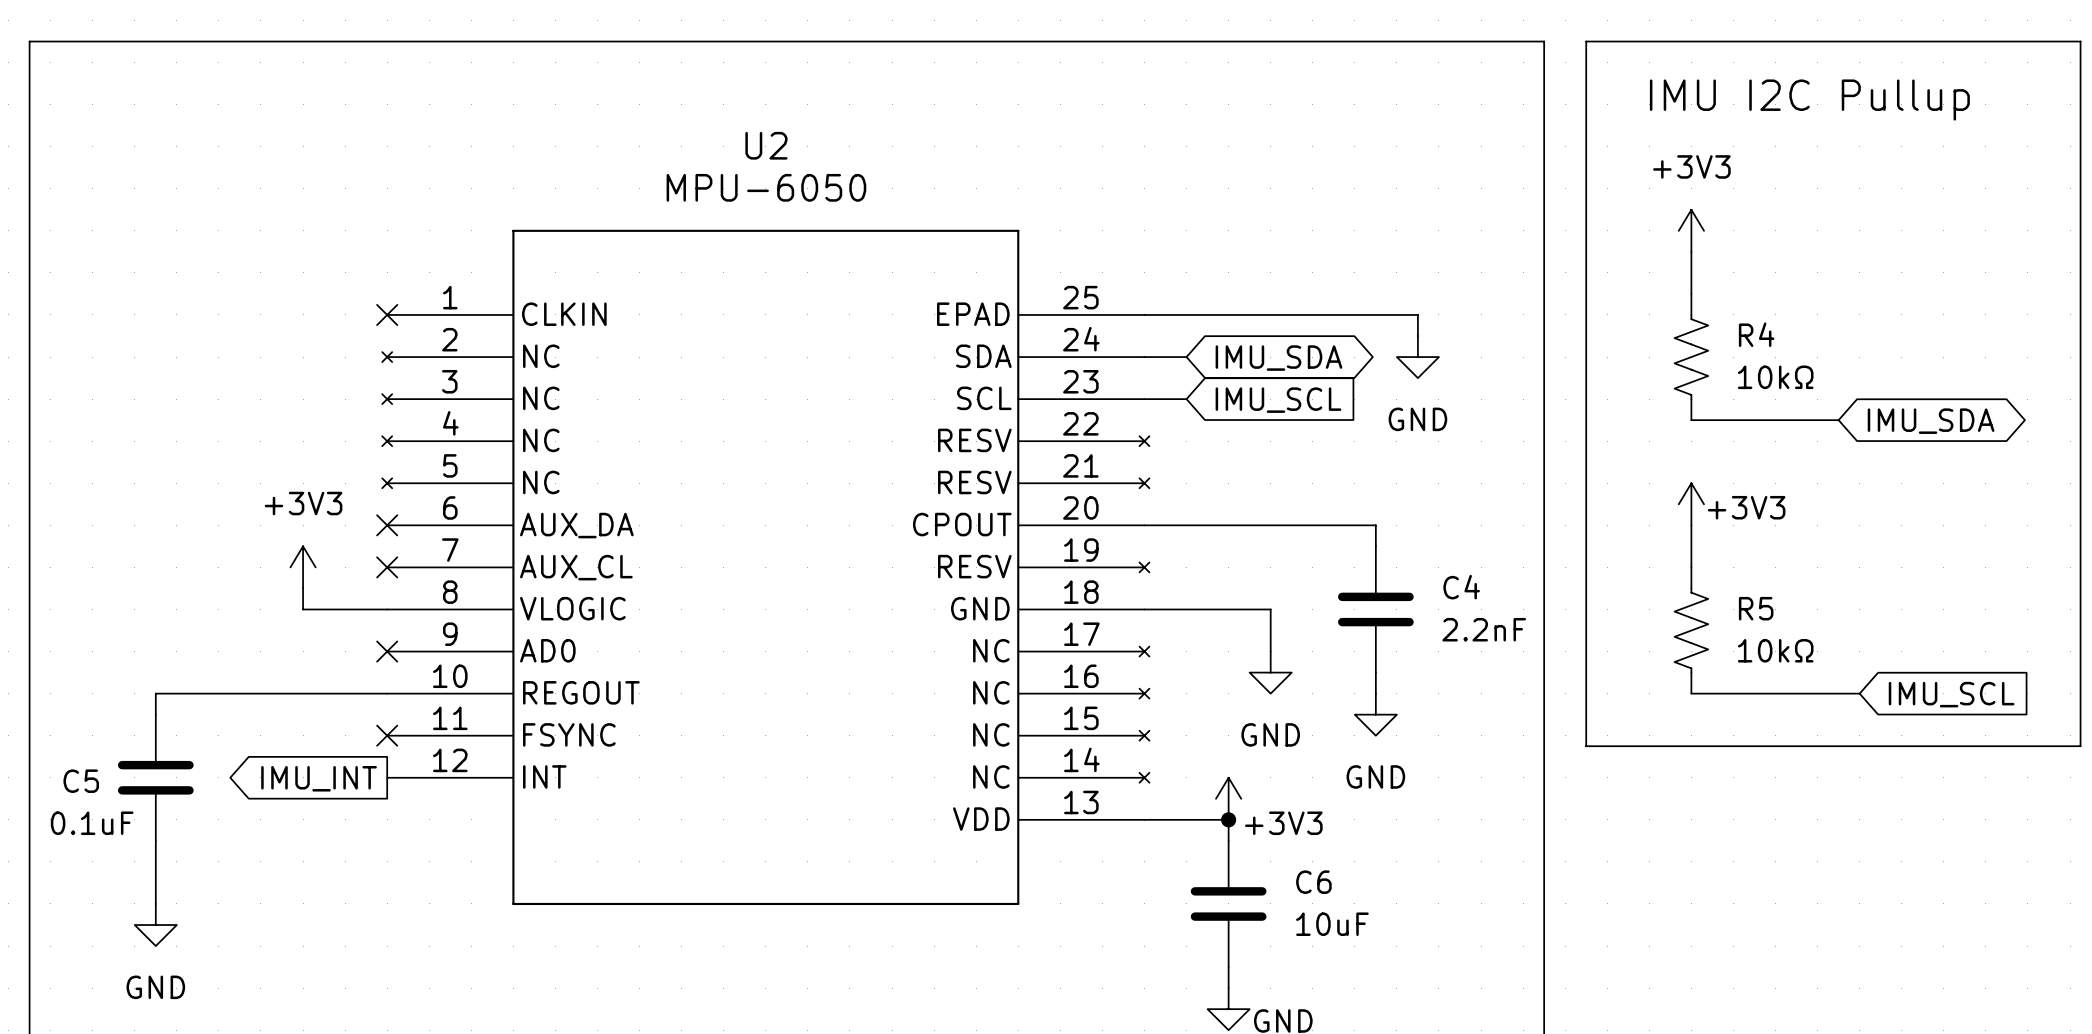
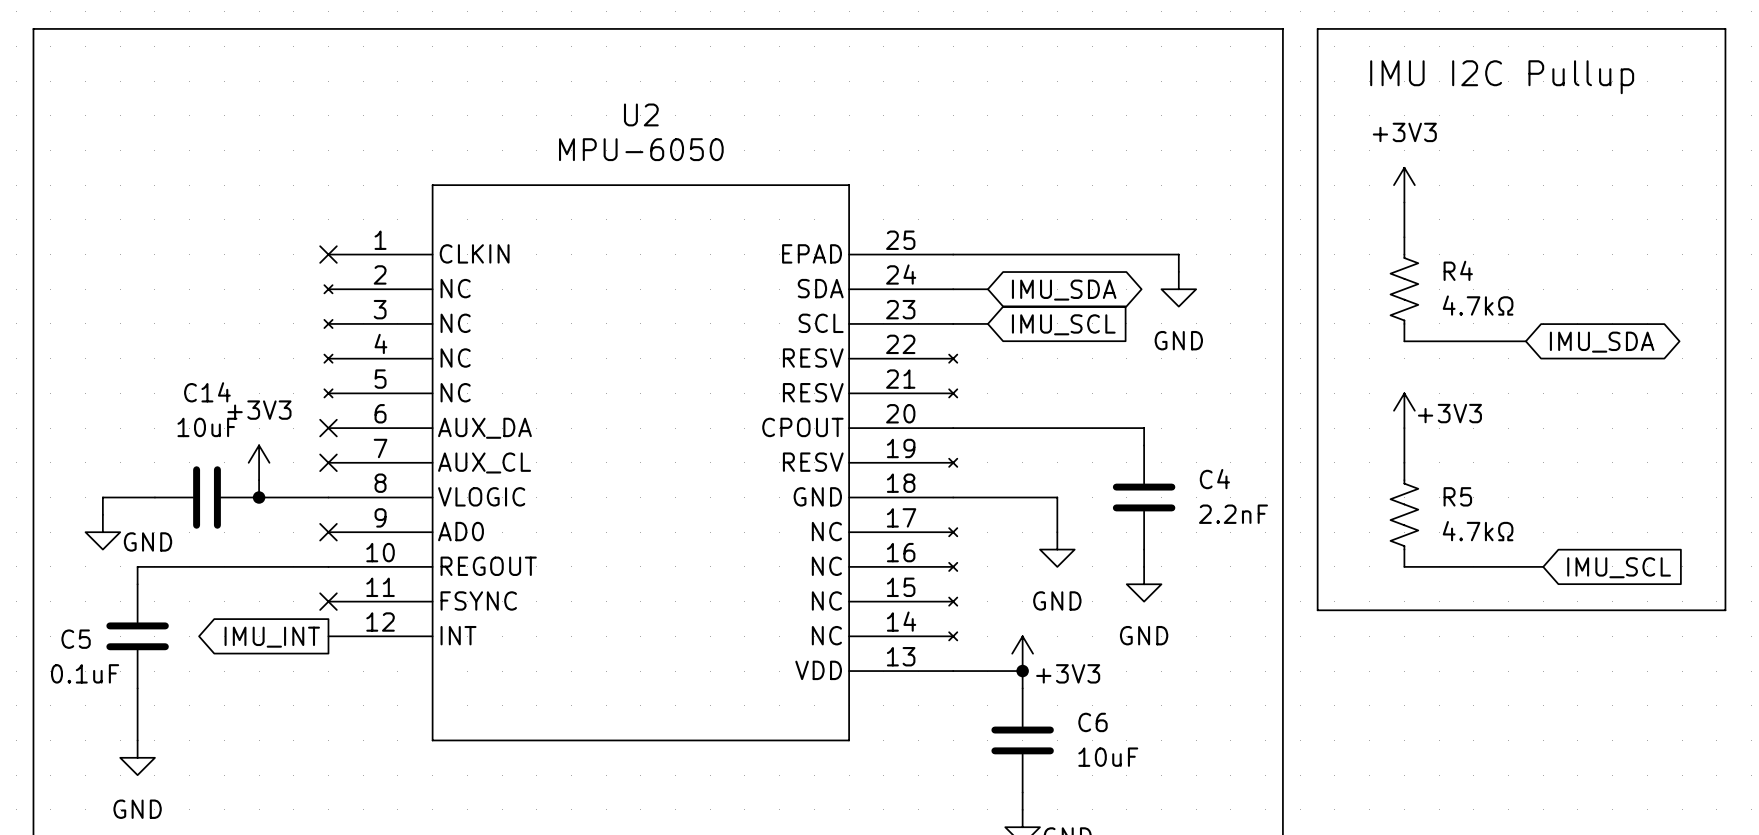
R4 value: 10kΩ (1775, 377) -> 4.7kΩ (1478, 305)
wire: none -> (154, 497) (102, 497) (102, 514)
C14: none -> 10uF (207, 497)
junction: none -> (259, 497)
R5 value: 10kΩ (1775, 650) -> 4.7kΩ (1478, 531)
power symbol: none -> GND (102, 532)

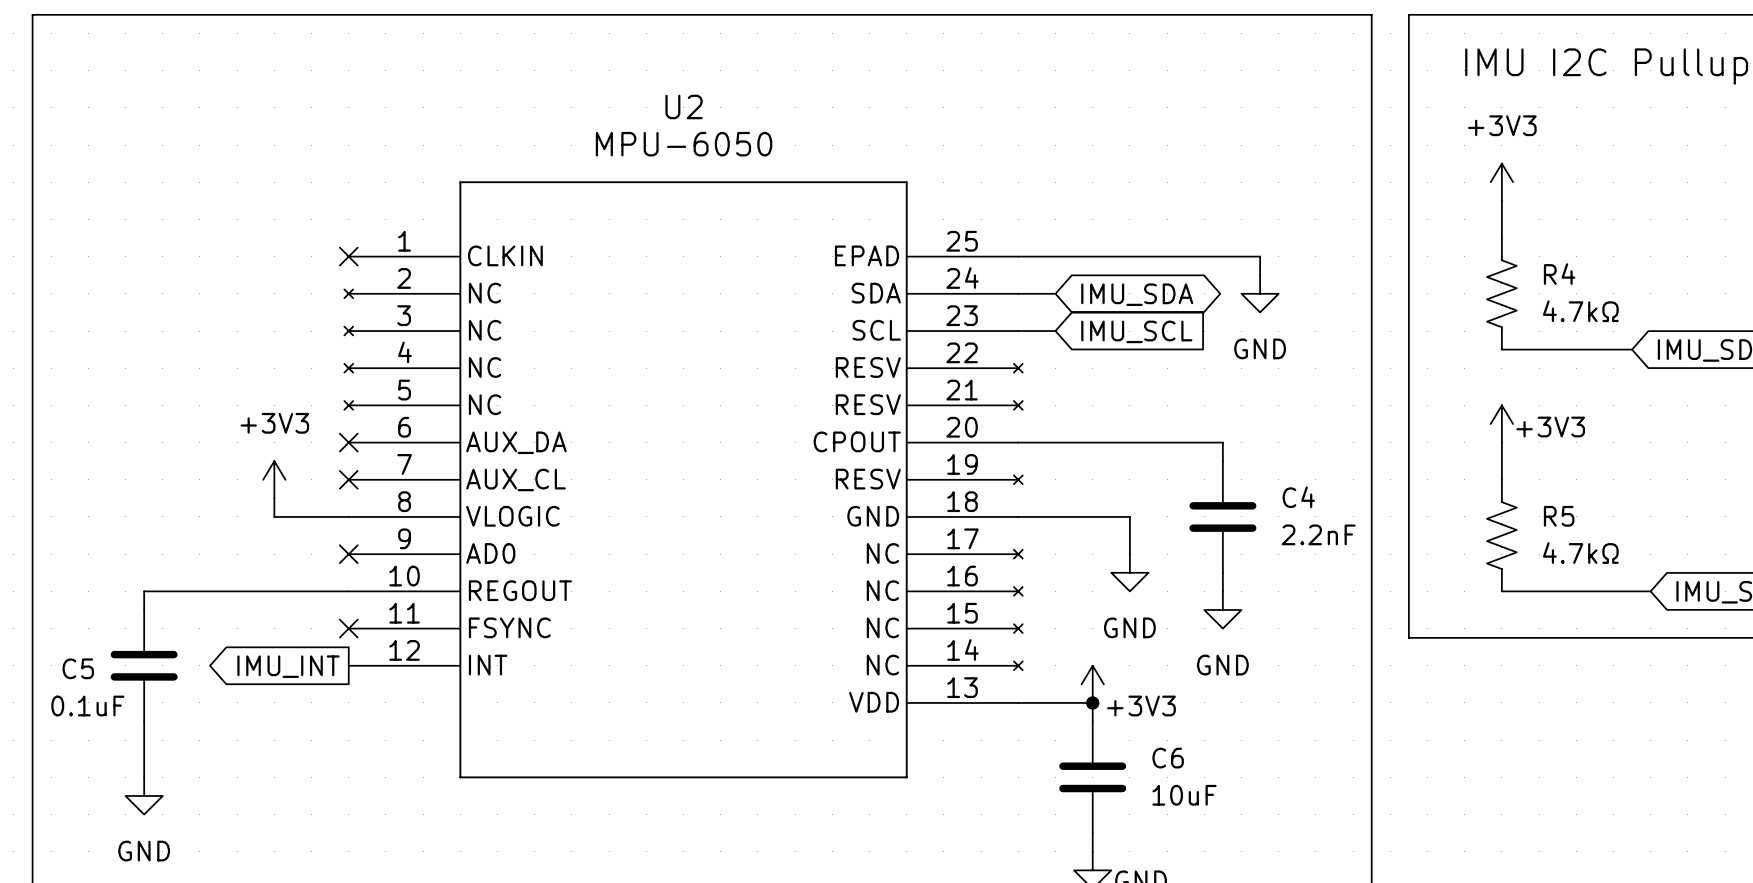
wire: (154, 497) (102, 497) (102, 514) -> none
C14: 10uF (207, 497) -> none
junction: (259, 497) -> none
power symbol: GND (102, 532) -> none

